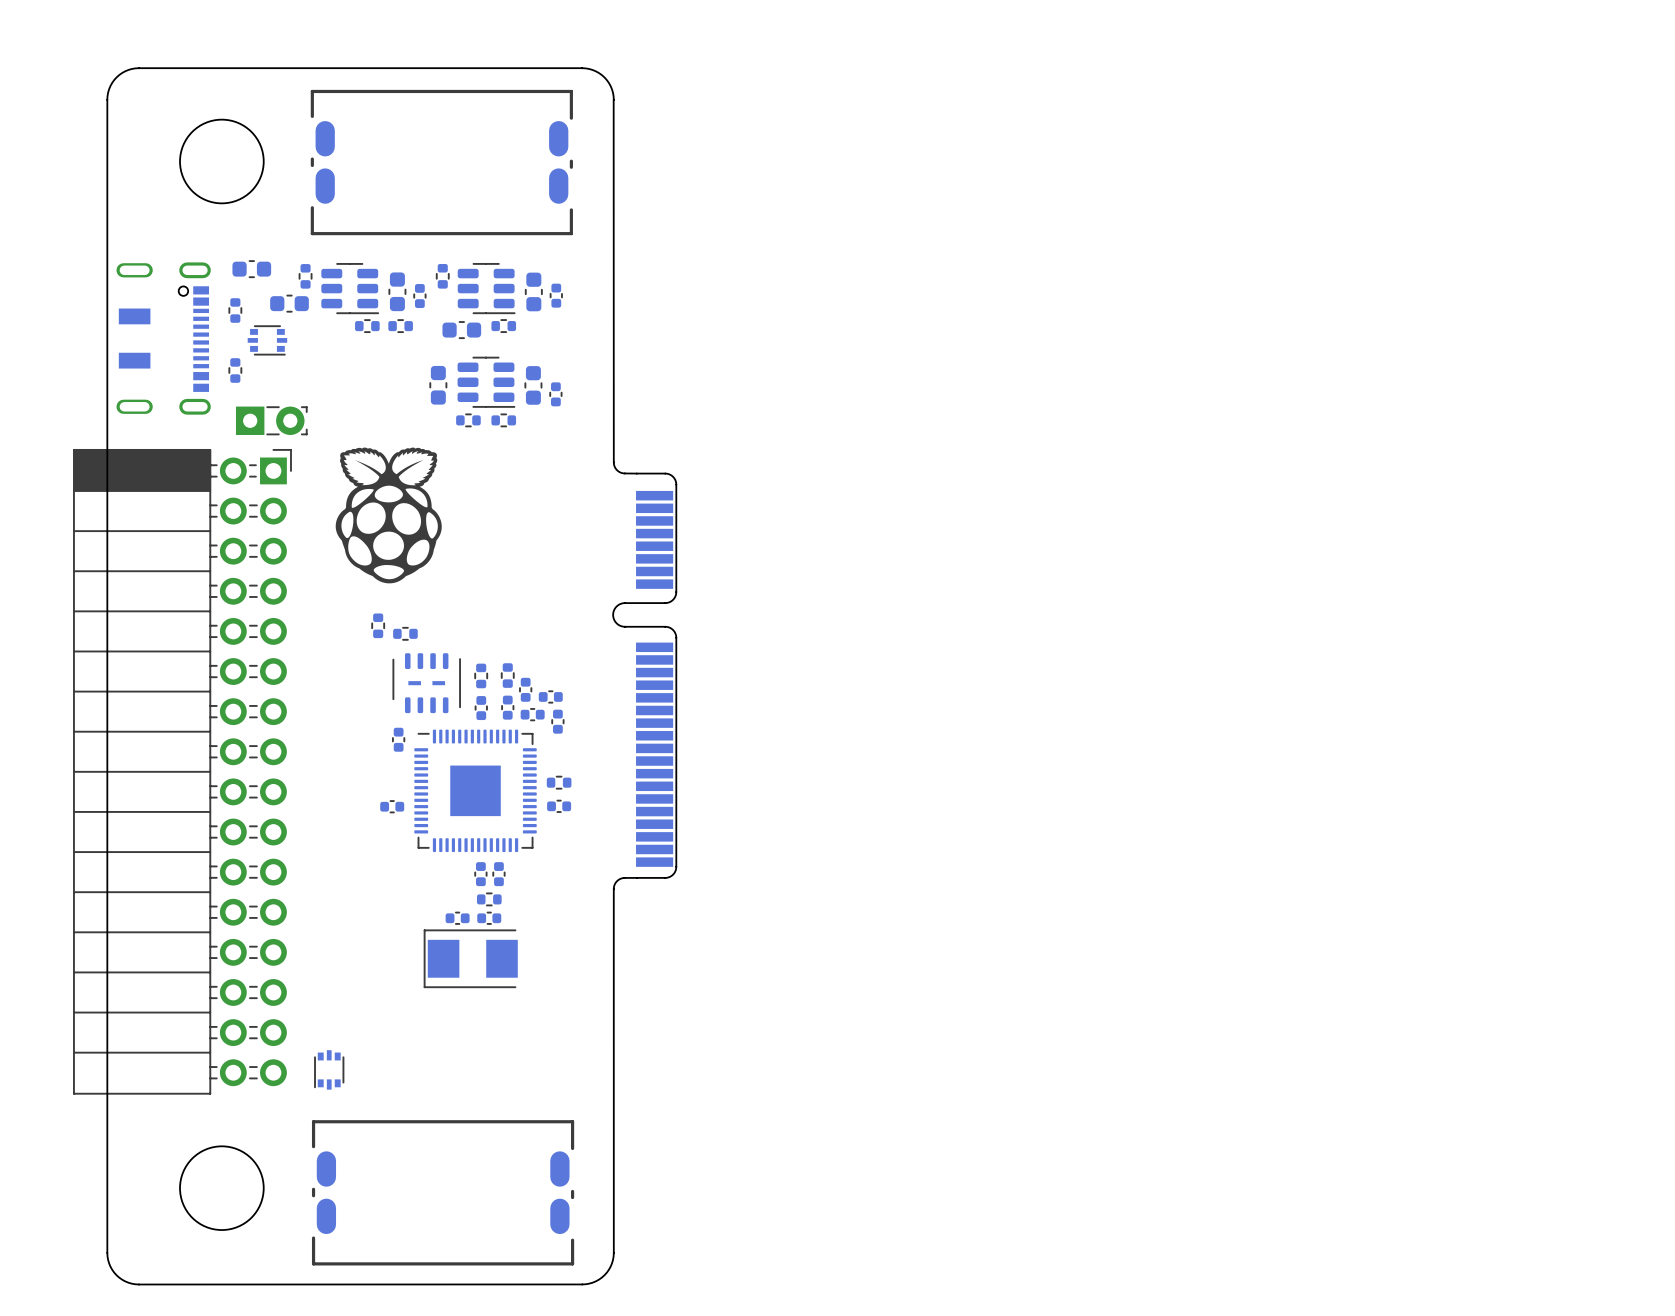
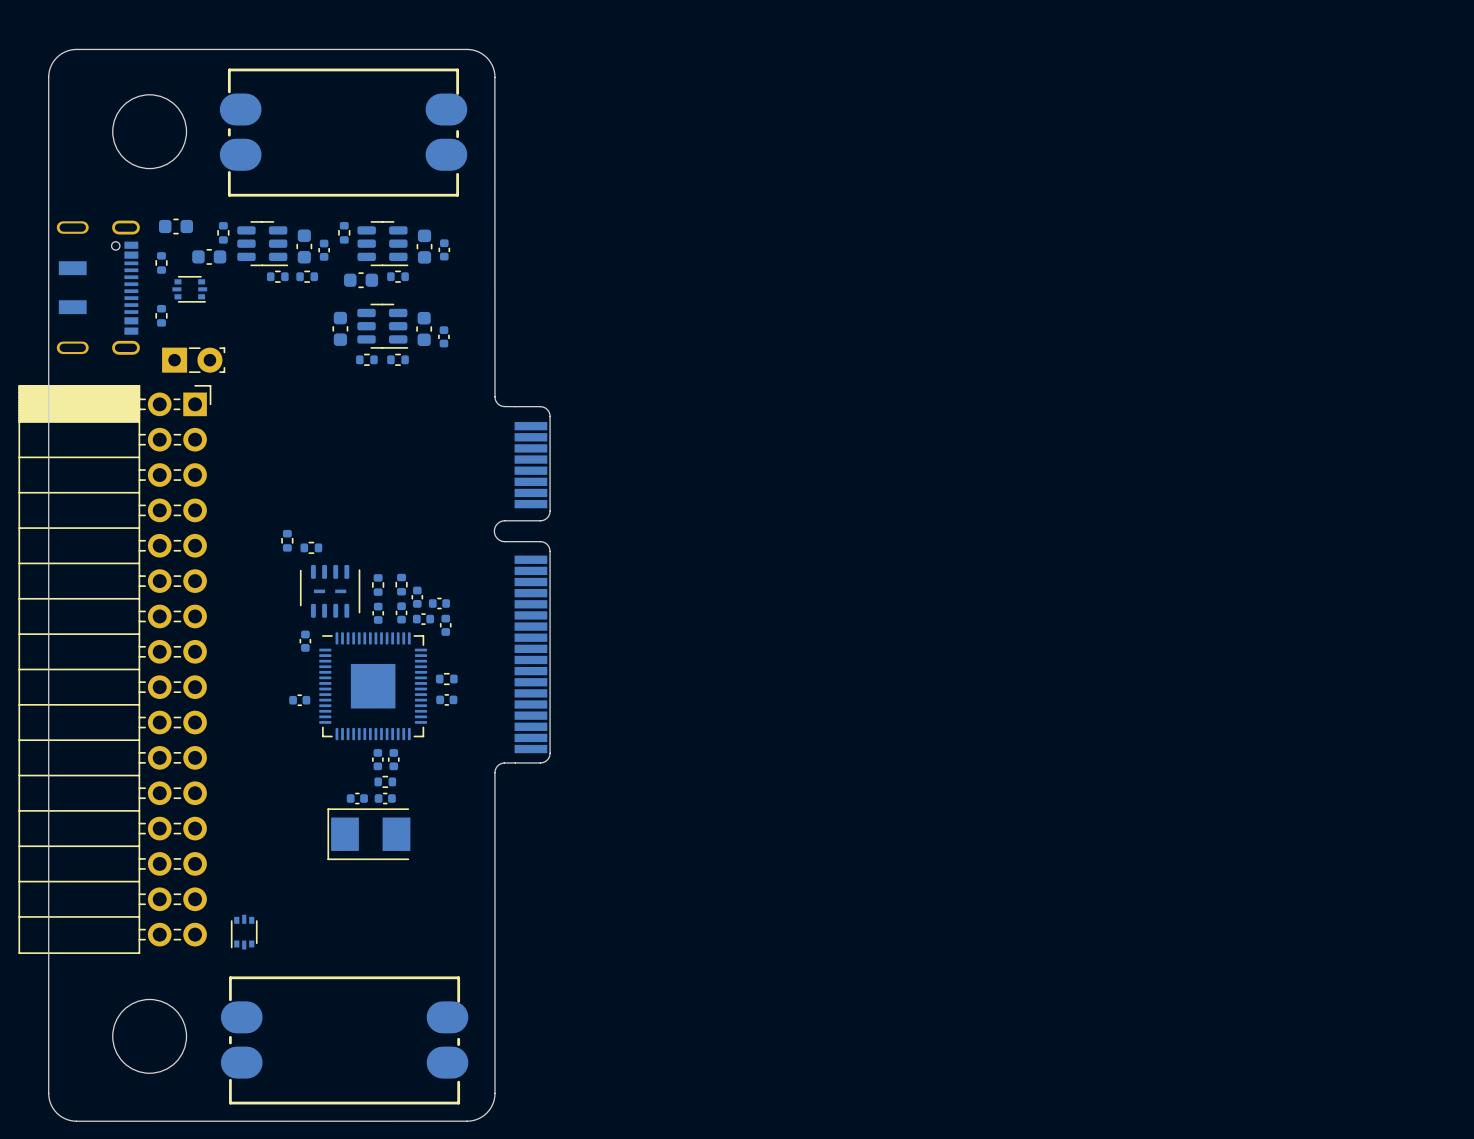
part footprint: [310, 89, 573, 236] -> [219, 68, 468, 197]
drawing: [335, 447, 442, 584] -> none
part footprint: [311, 1120, 575, 1266] -> [220, 976, 469, 1105]

